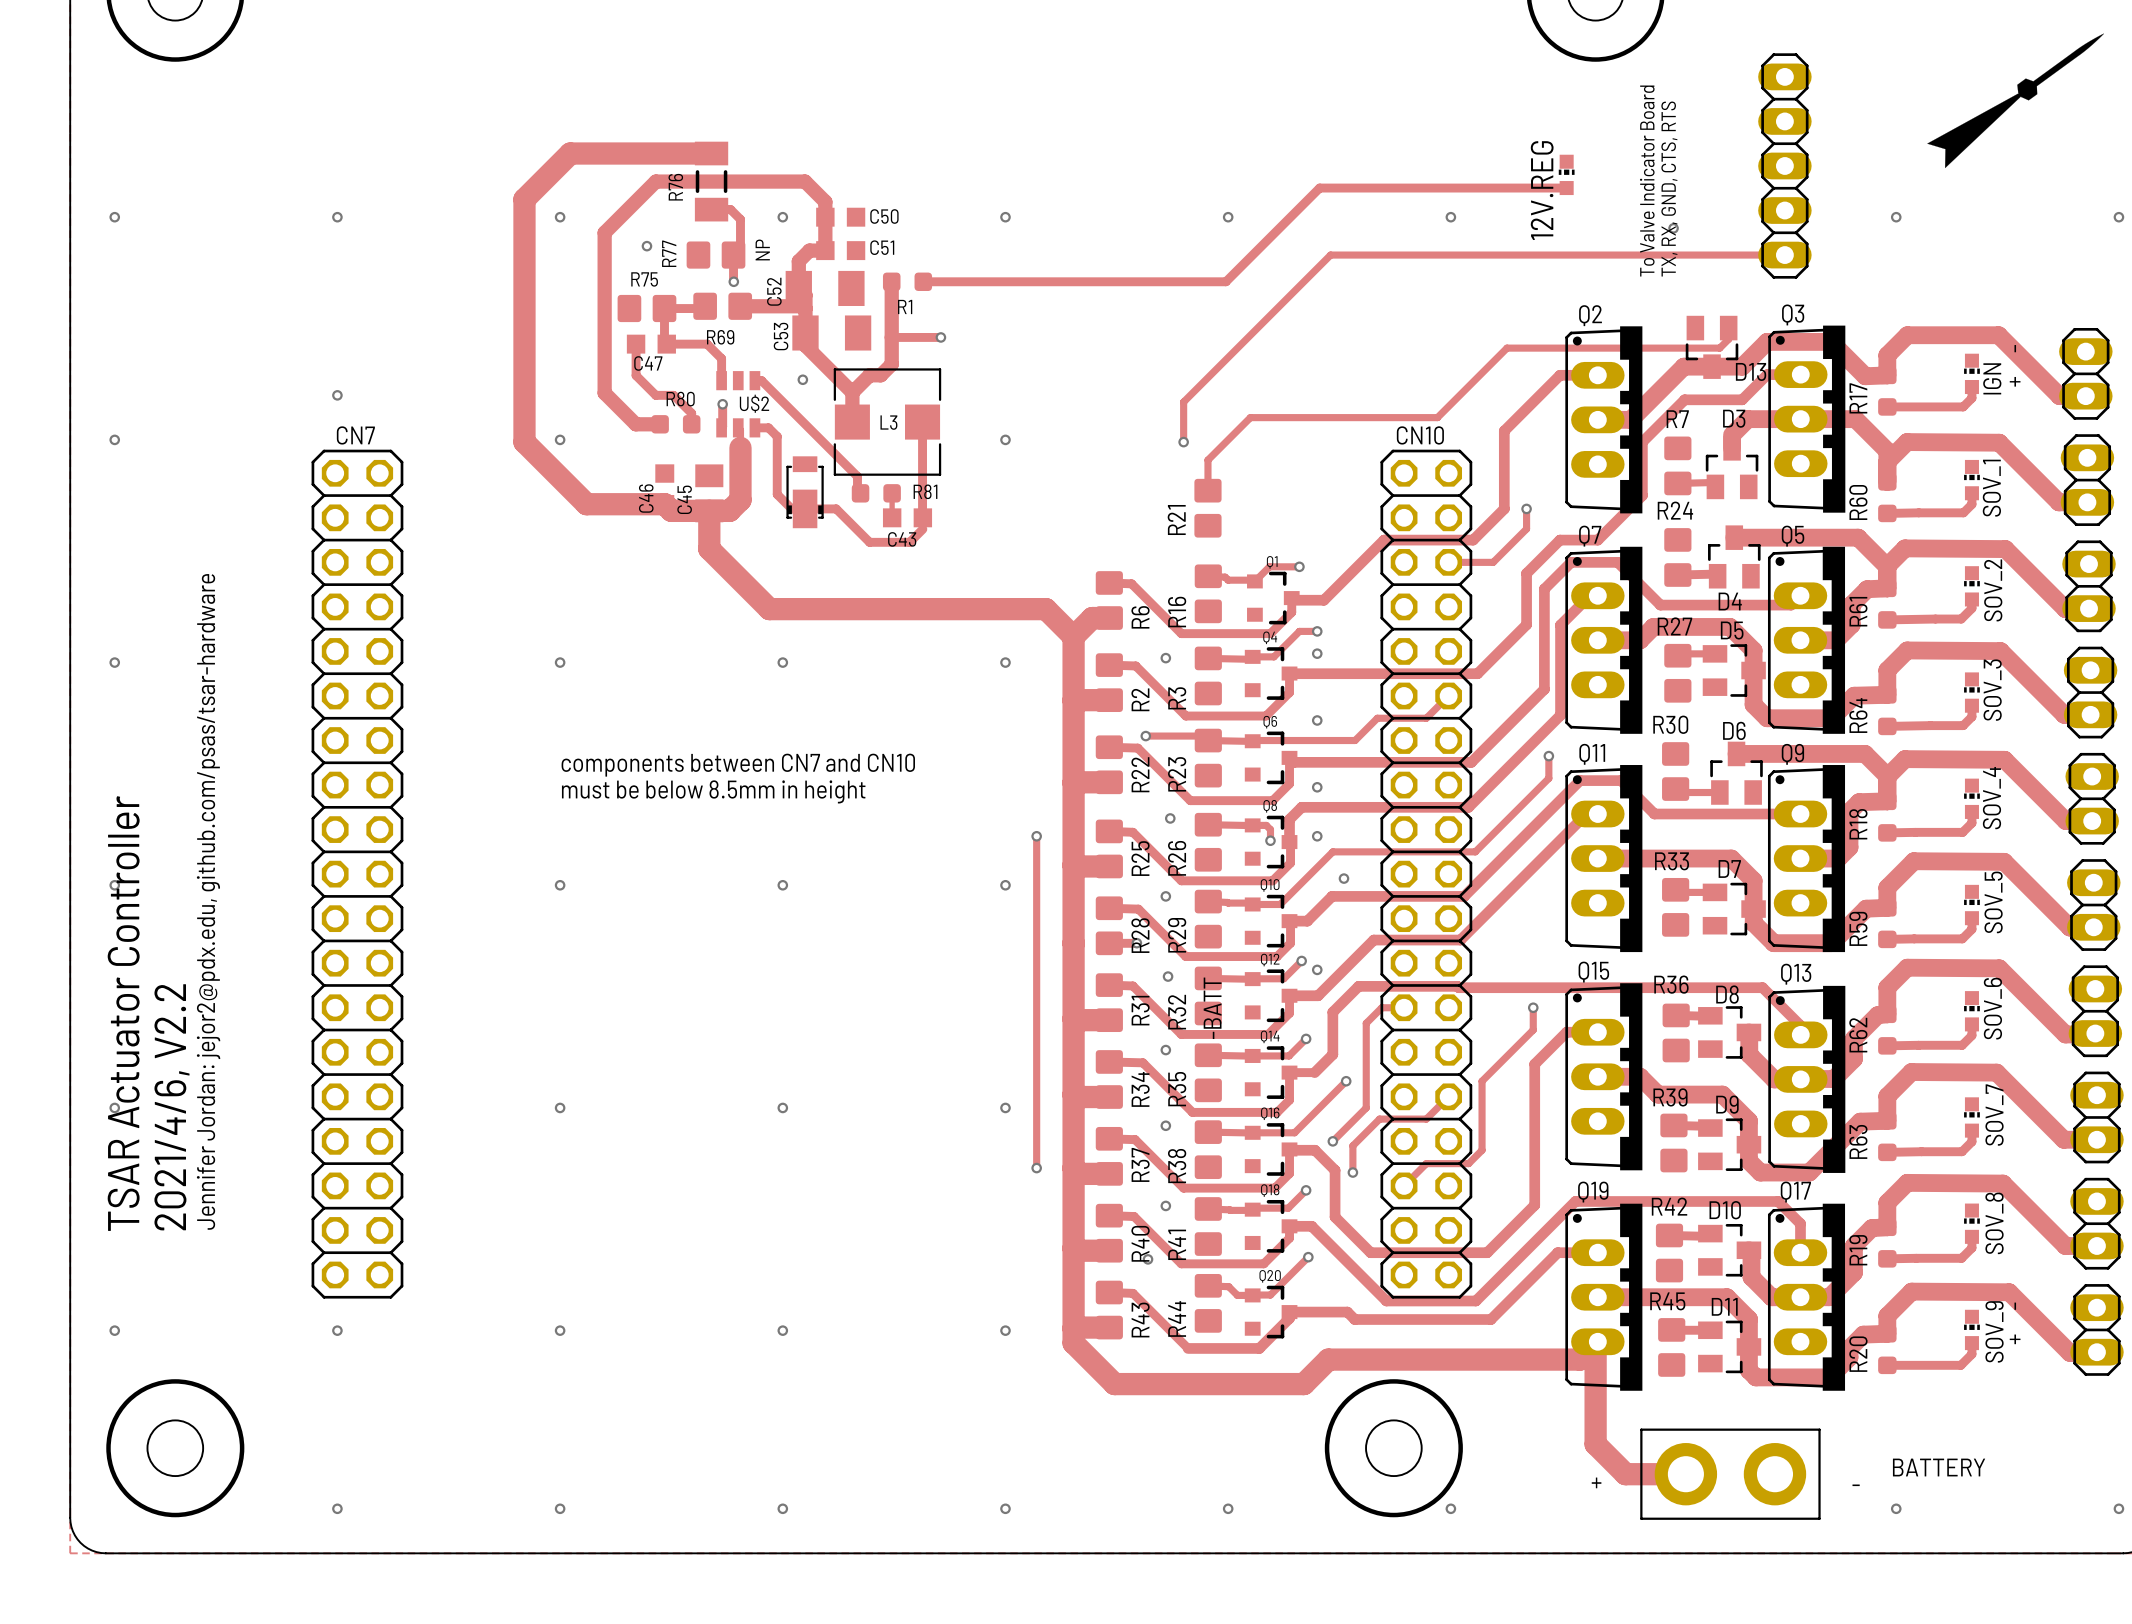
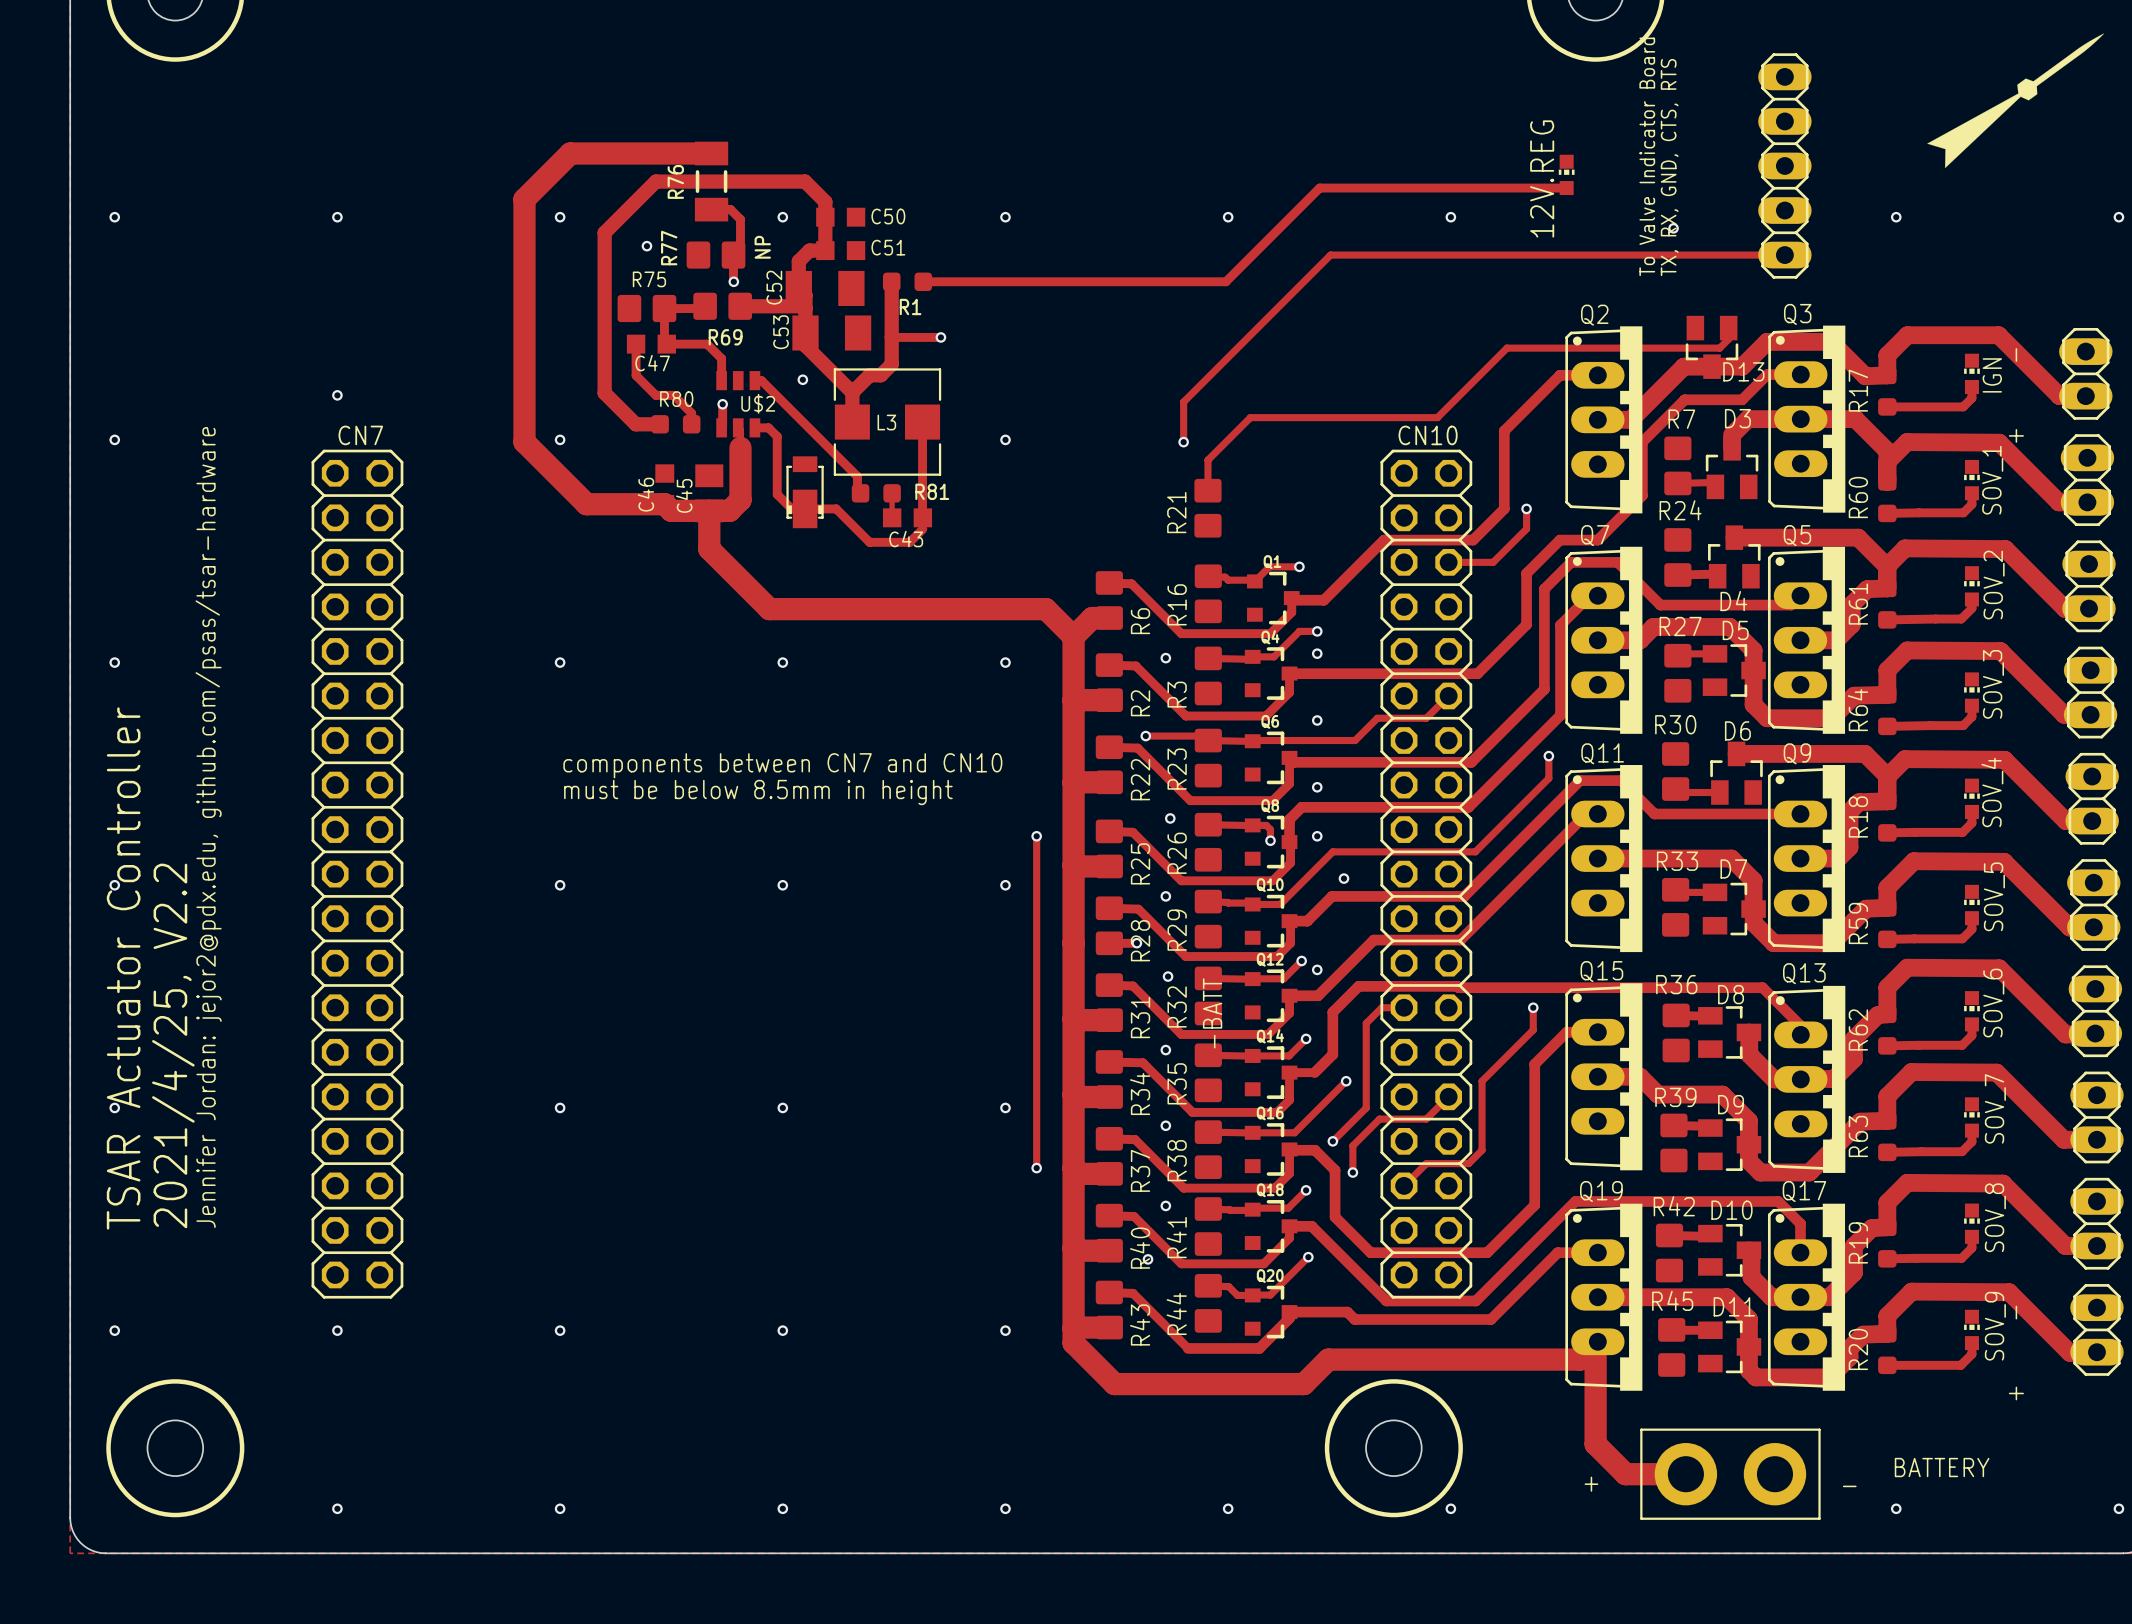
text: 2021/4/6, V2.2 (171, 1107) -> 2021/4/25, V2.2 (173, 1045)

